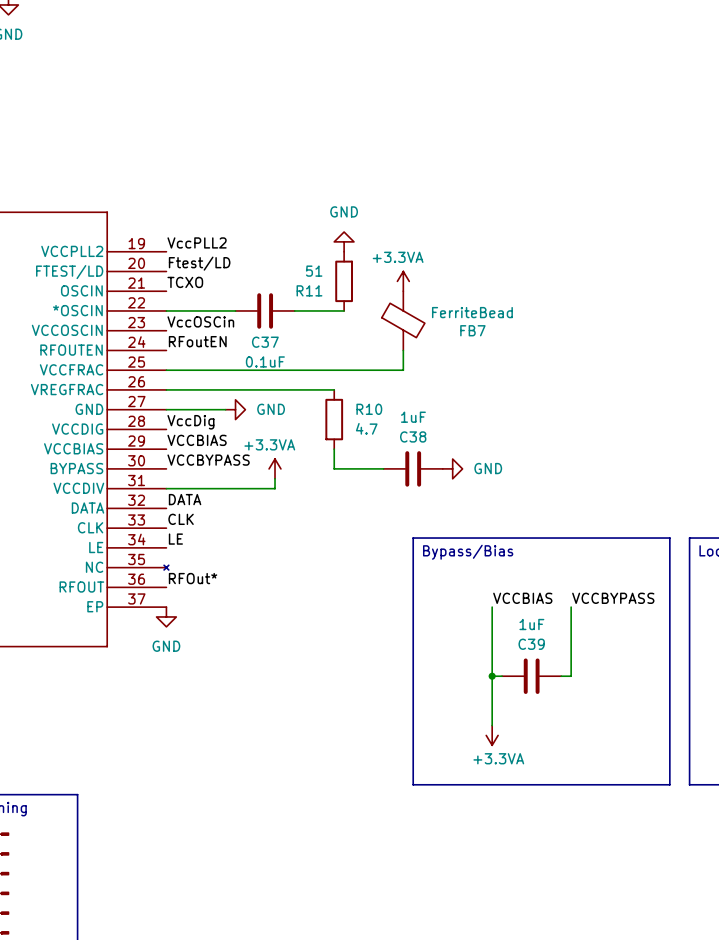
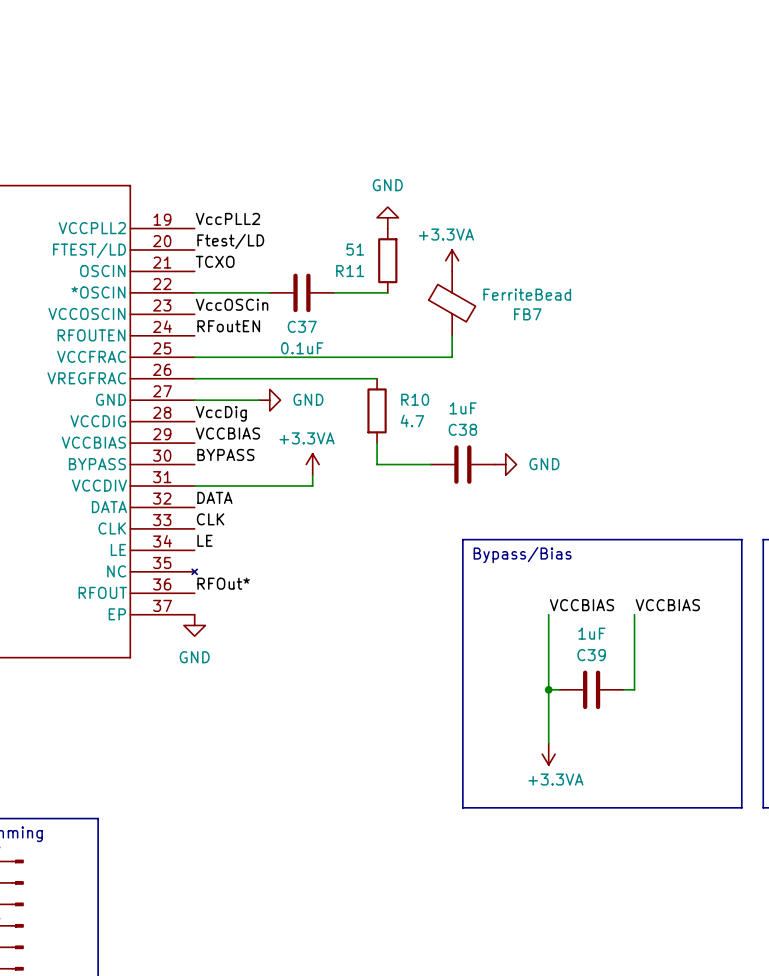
label: VCCBYPASS (208, 460) -> BYPASS (225, 454)
label: VCCBYPASS (613, 598) -> VCCBIAS (667, 605)

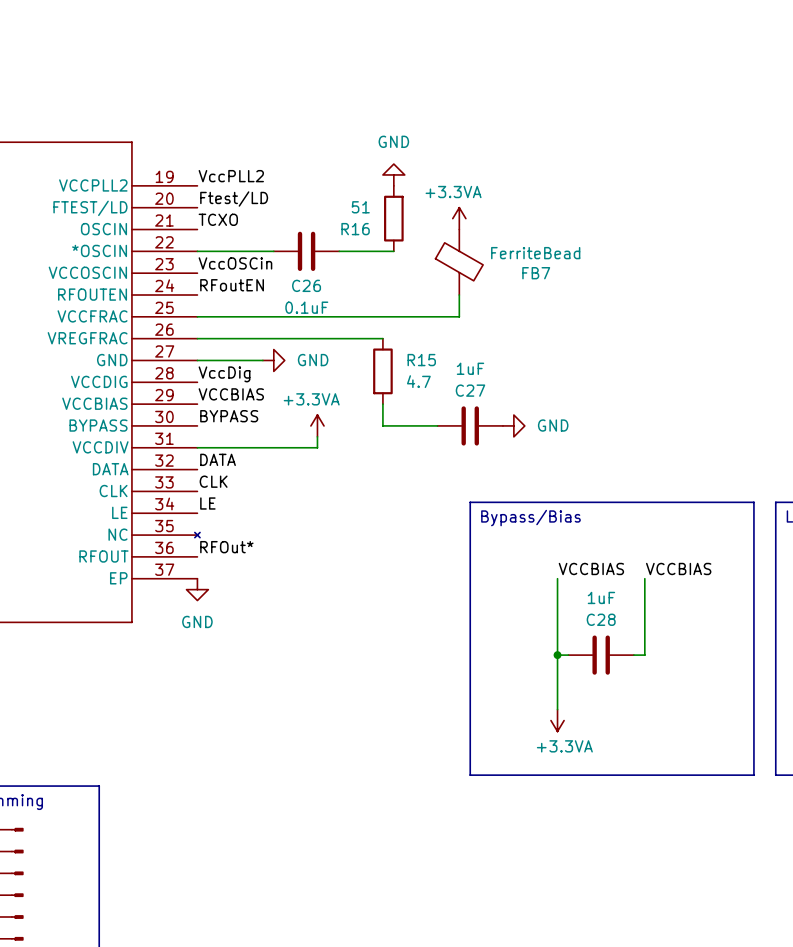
R11 name: R11 (350, 271) -> R16 (355, 229)
C37 name: C37 (302, 326) -> C26 (306, 285)
R10 name: R10 (415, 399) -> R15 (421, 360)
C38 name: C38 (462, 429) -> C27 (470, 390)
C39 name: C39 (591, 655) -> C28 (601, 619)

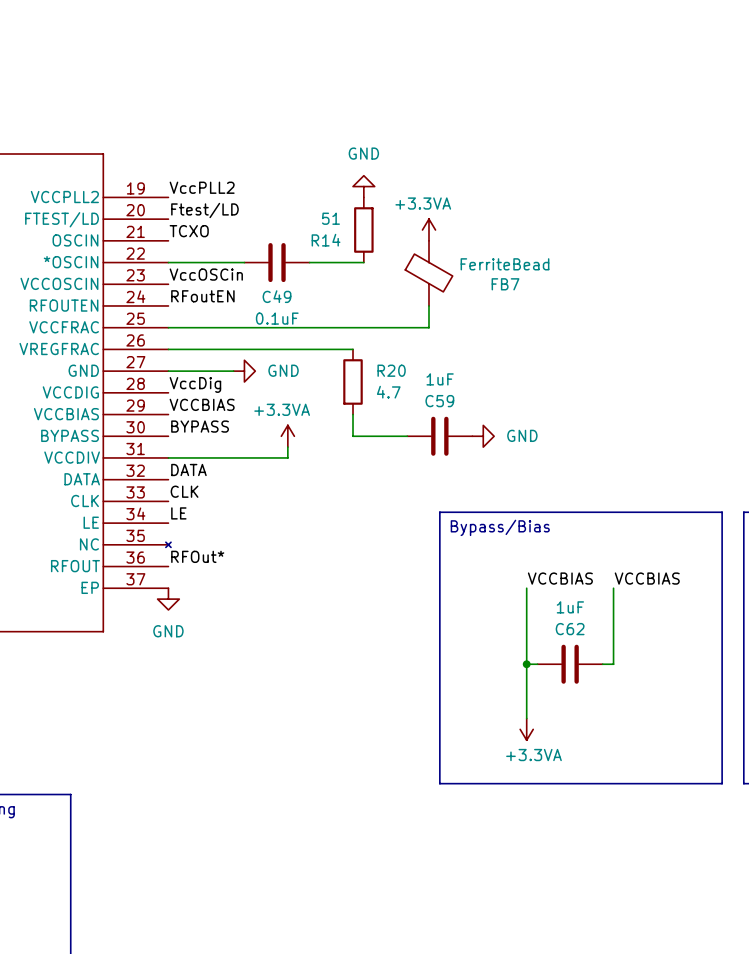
R16 name: R16 (355, 229) -> R14 (326, 240)
C26 name: C26 (306, 285) -> C49 (277, 296)
R15 name: R15 (421, 360) -> R20 (391, 370)
C27 name: C27 (470, 390) -> C59 (439, 401)
C28 name: C28 (601, 619) -> C62 (570, 629)

